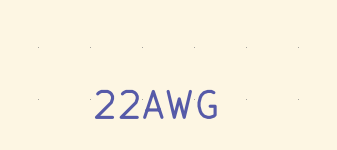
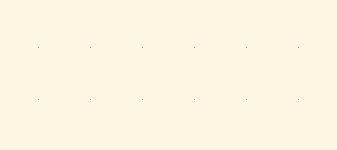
text: 22AWG (155, 104) -> none

